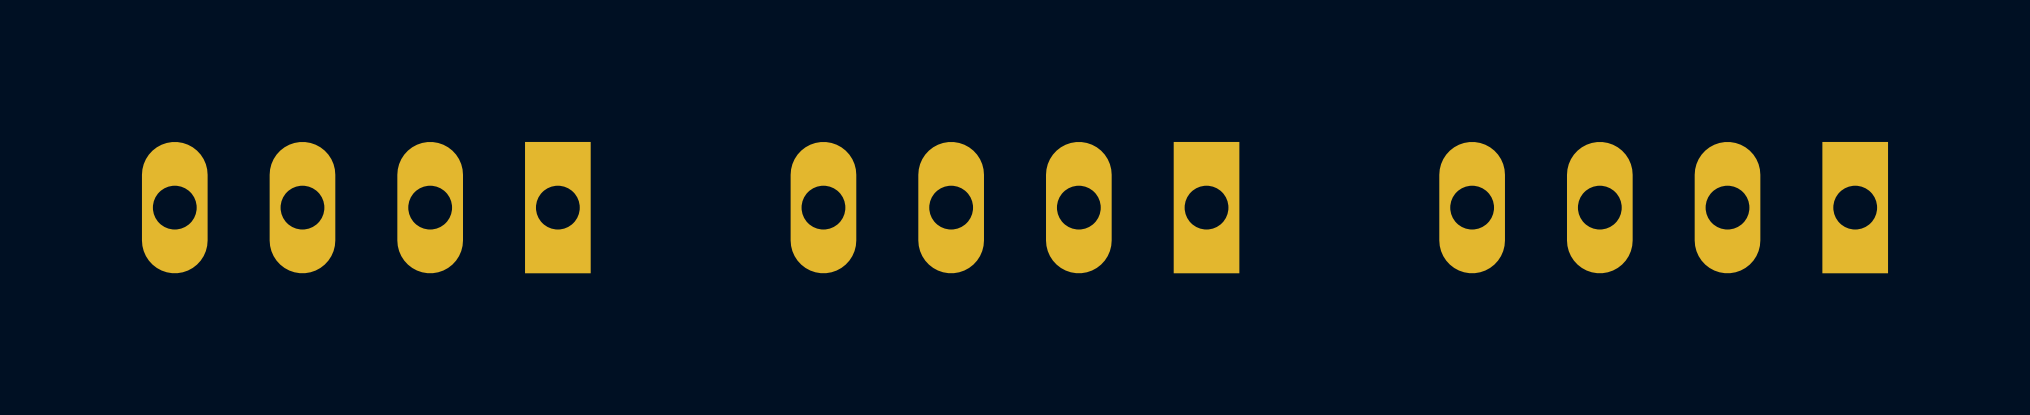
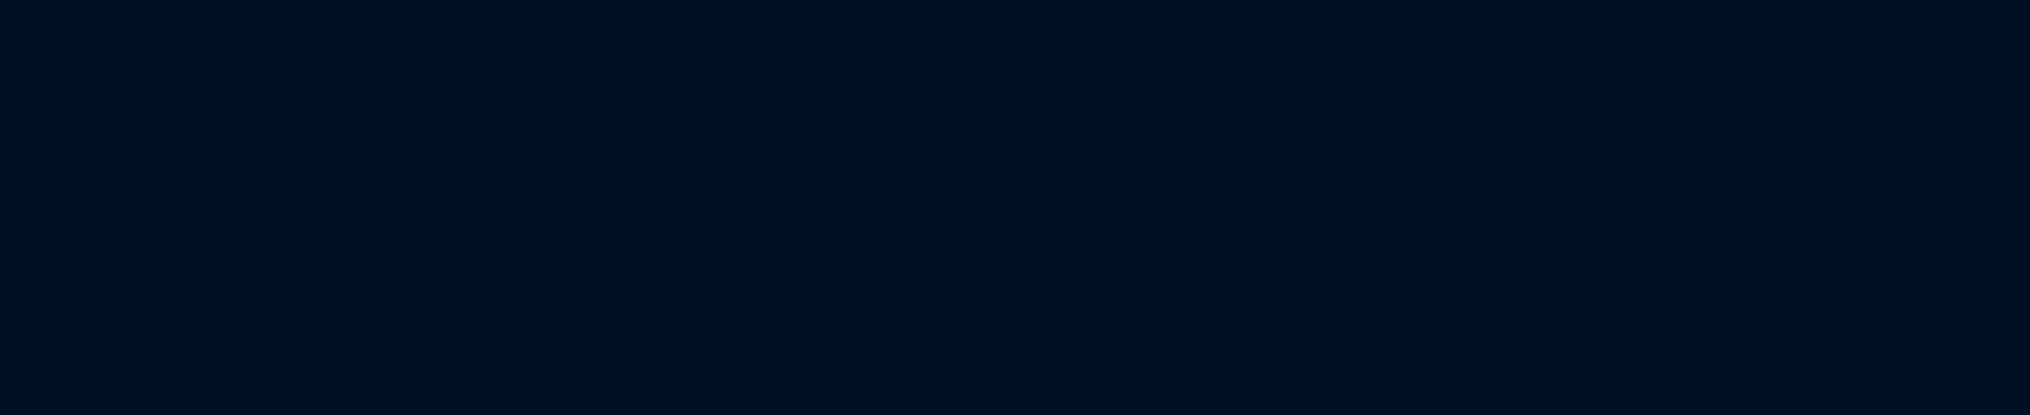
part: (366, 207) -> none
part: (1014, 207) -> none
part: (1663, 207) -> none

